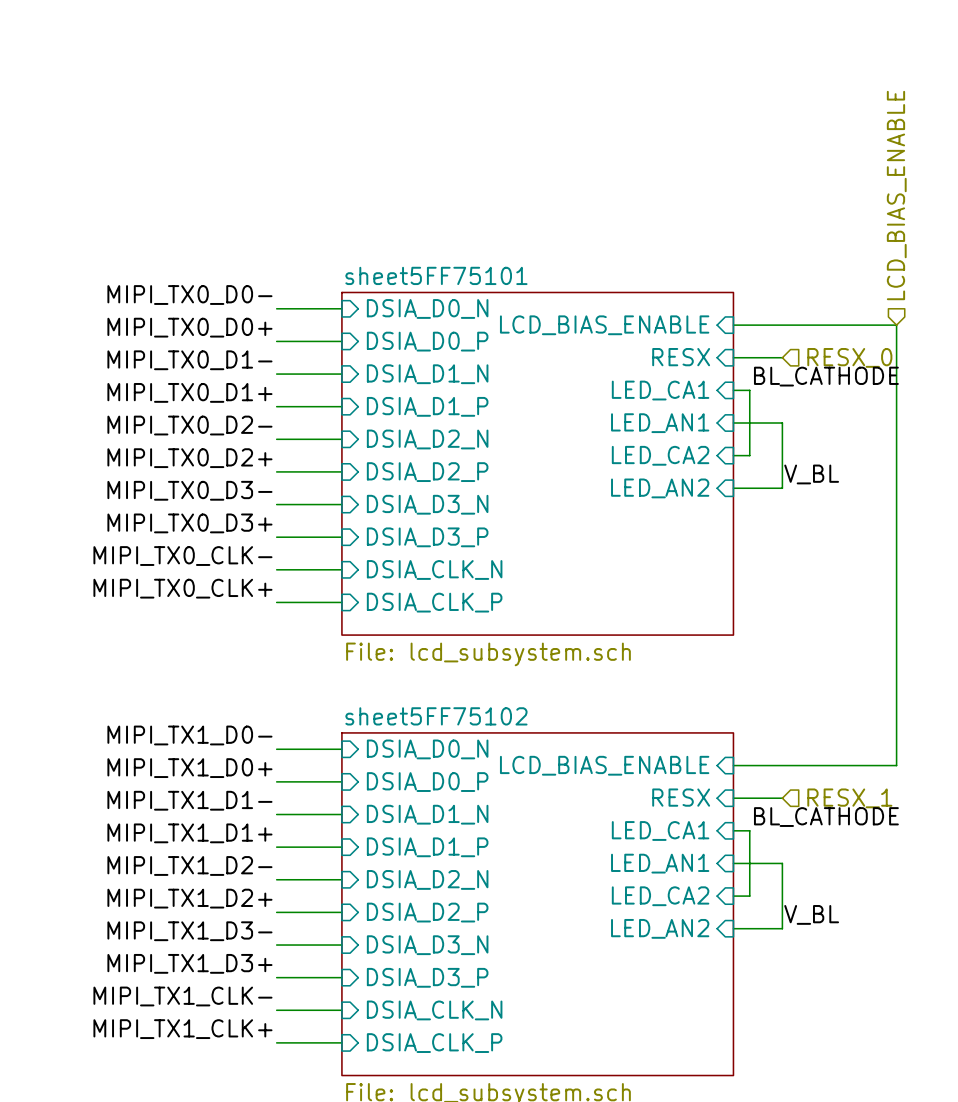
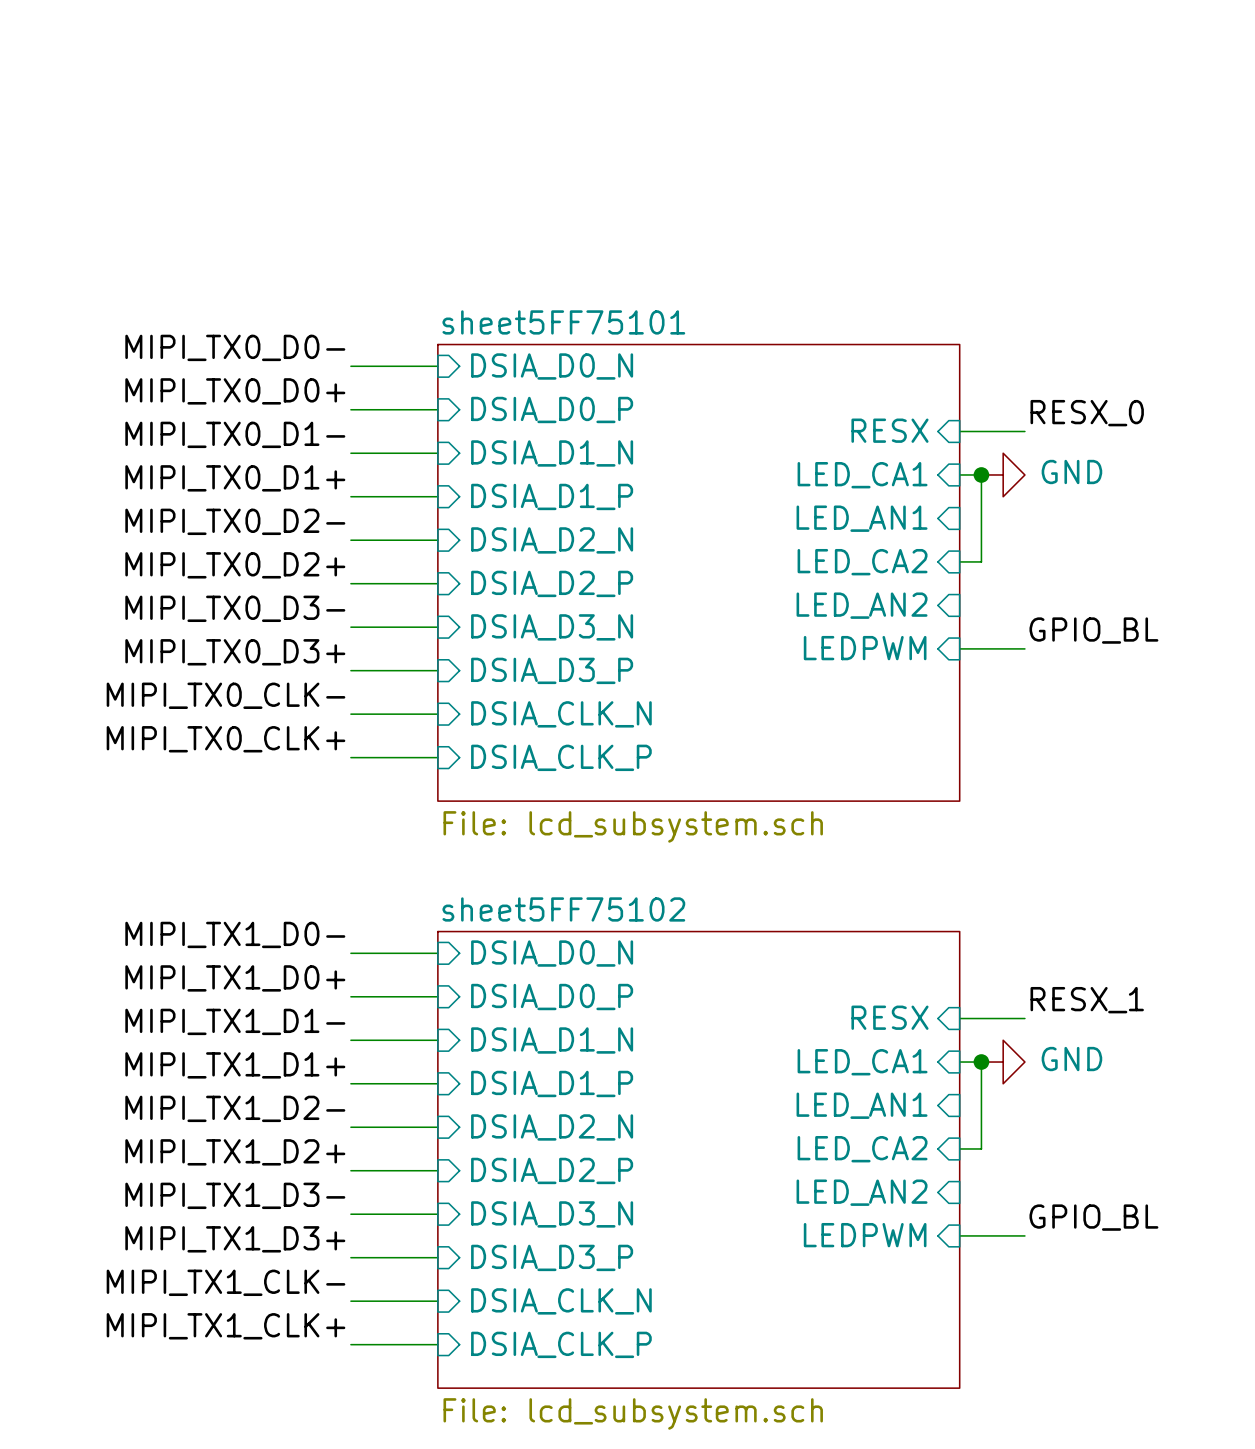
hierarchical label: LCD_BIAS_ENABLE (896, 195) -> none
sheet pin: LCD_BIAS_ENABLE (604, 325) -> none
wire: (733, 325) (896, 325) (896, 765) (733, 765) -> none
label: none -> RESX_0 (1087, 413)
hierarchical label: RESX_0 (849, 357) -> none
label: BL_CATHODE (826, 376) -> none
junction: none -> (981, 474)
power symbol: none -> GND (1003, 474)
wire: (733, 422) (782, 422) (782, 488) (733, 488) -> none
label: V_BL (811, 474) -> none
label: none -> GPIO_BL (1093, 630)
sheet pin: none -> LEDPWM (865, 648)
wire: none -> (959, 648) (1024, 648)
sheet pin: LCD_BIAS_ENABLE (604, 765) -> none
label: none -> RESX_1 (1087, 1000)
hierarchical label: RESX_1 (849, 798) -> none
label: BL_CATHODE (826, 817) -> none
junction: none -> (981, 1062)
power symbol: none -> GND (1003, 1062)
wire: (733, 863) (782, 863) (782, 928) (733, 928) -> none
label: V_BL (811, 914) -> none
label: none -> GPIO_BL (1093, 1217)
sheet pin: none -> LEDPWM (865, 1235)
wire: none -> (959, 1235) (1024, 1235)

